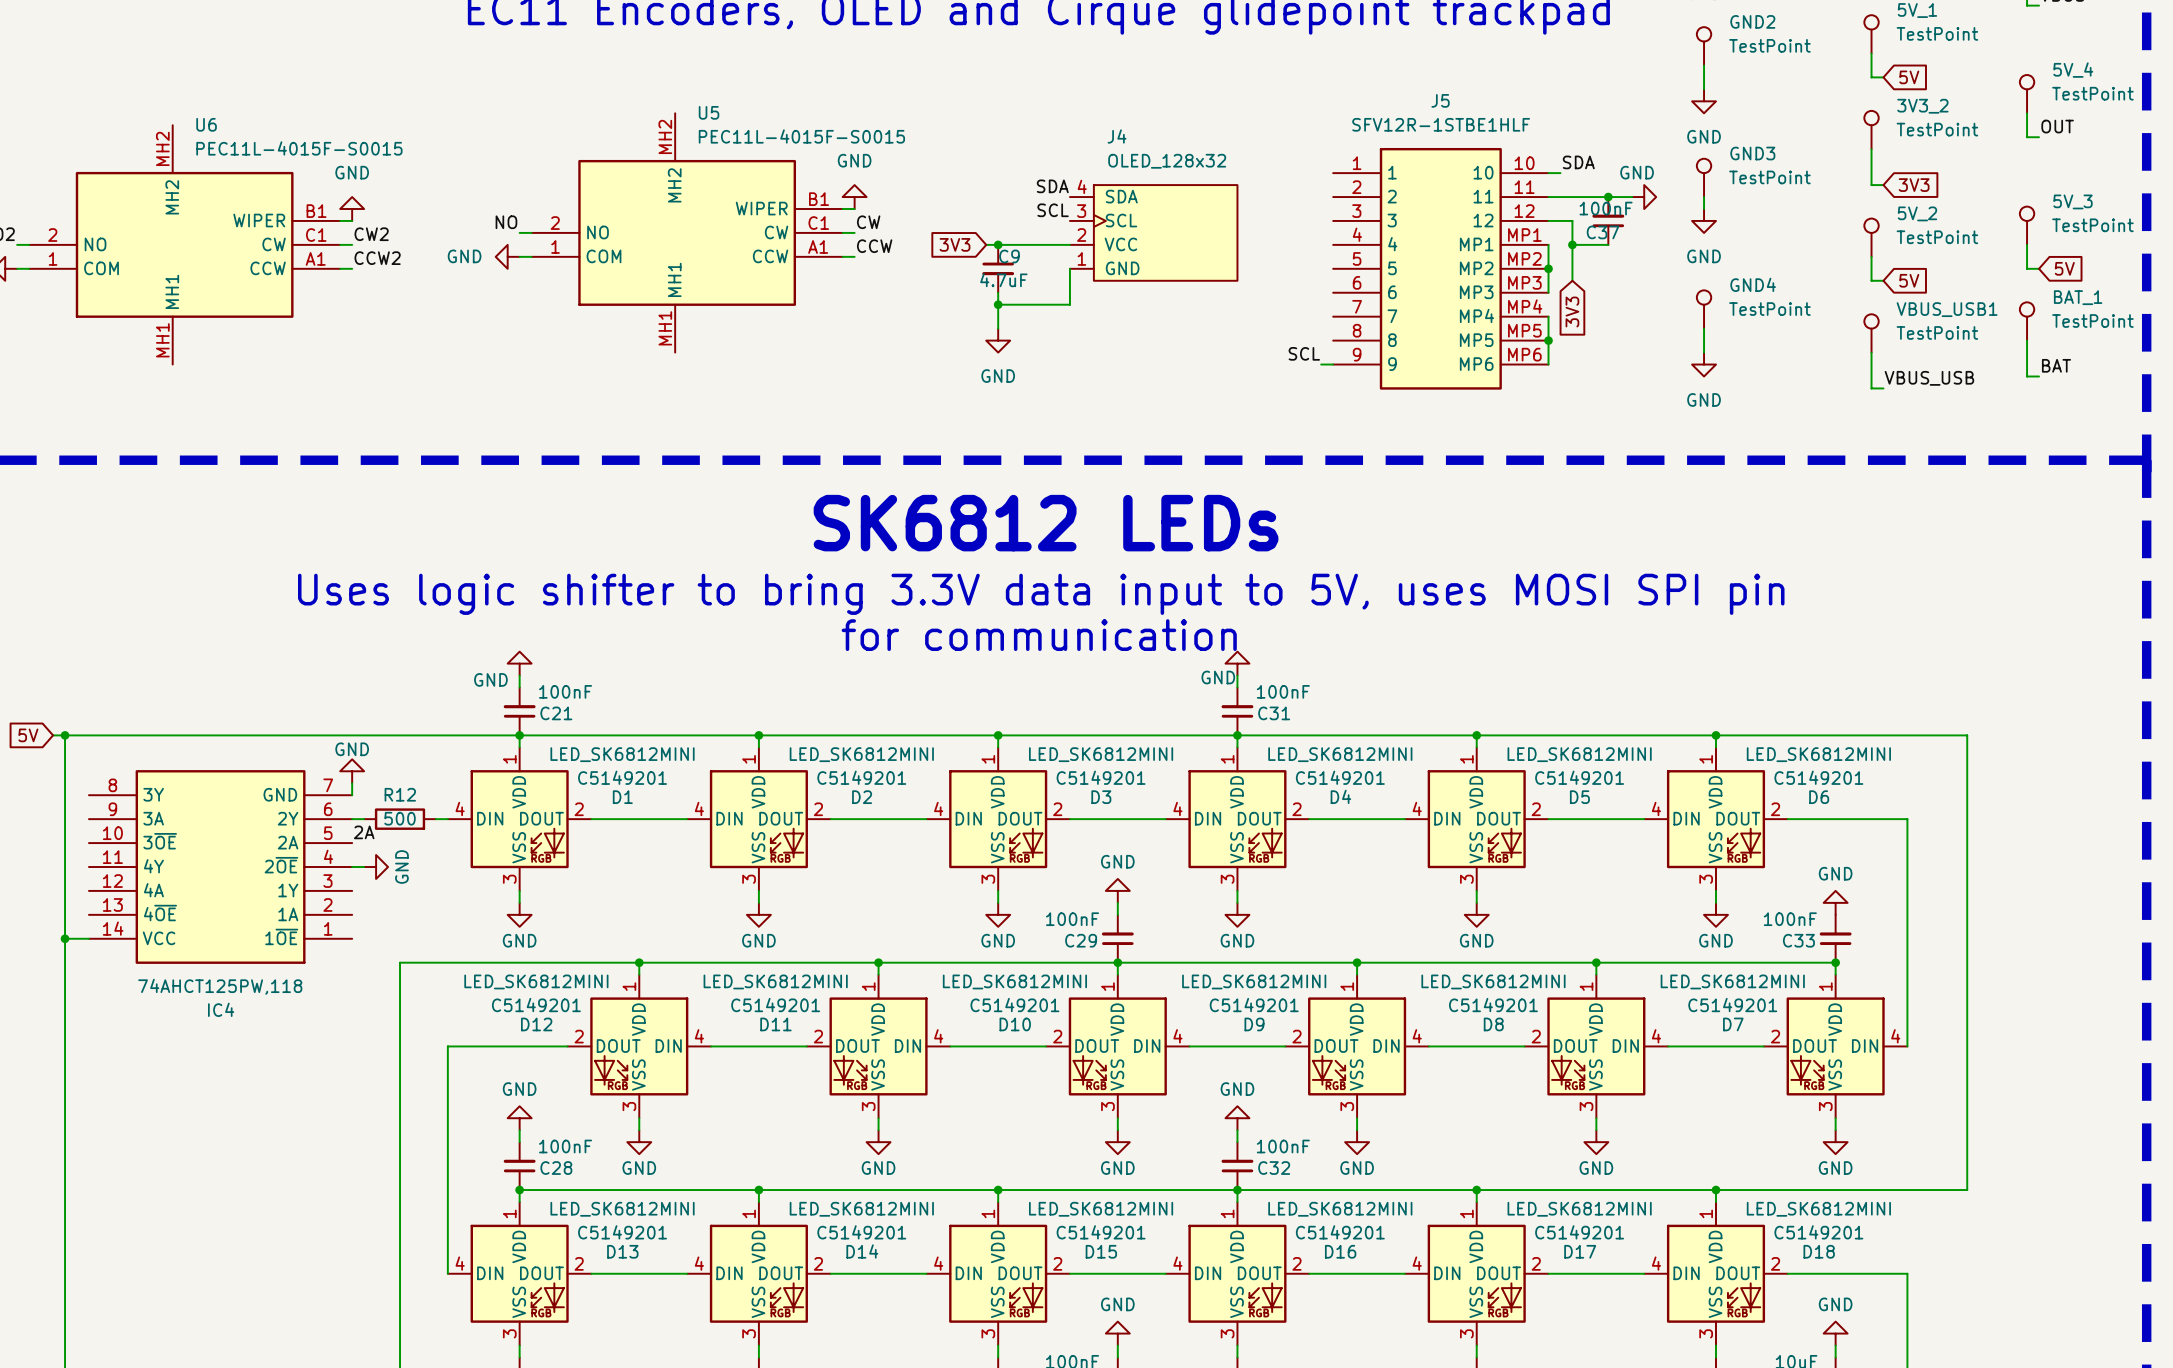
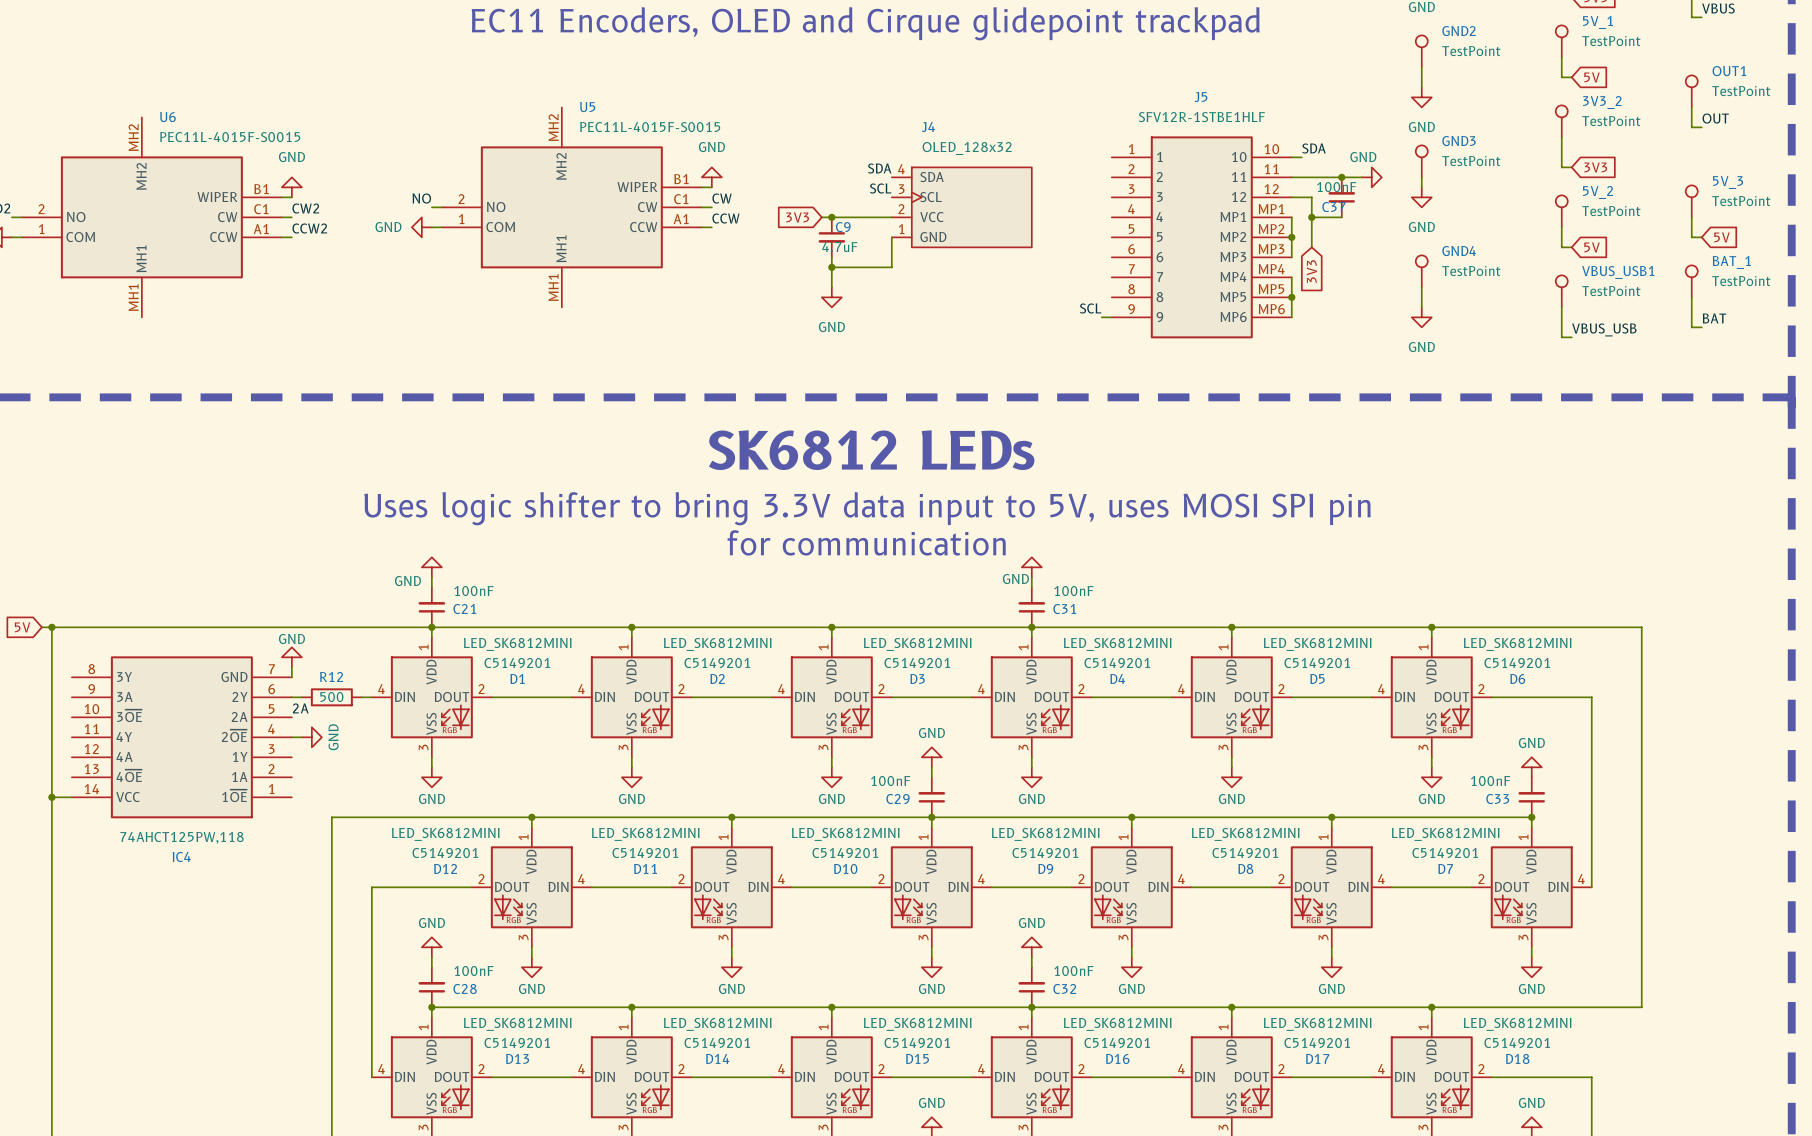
5V_4 name: 5V_4 (2073, 70) -> OUT1 (1729, 71)

